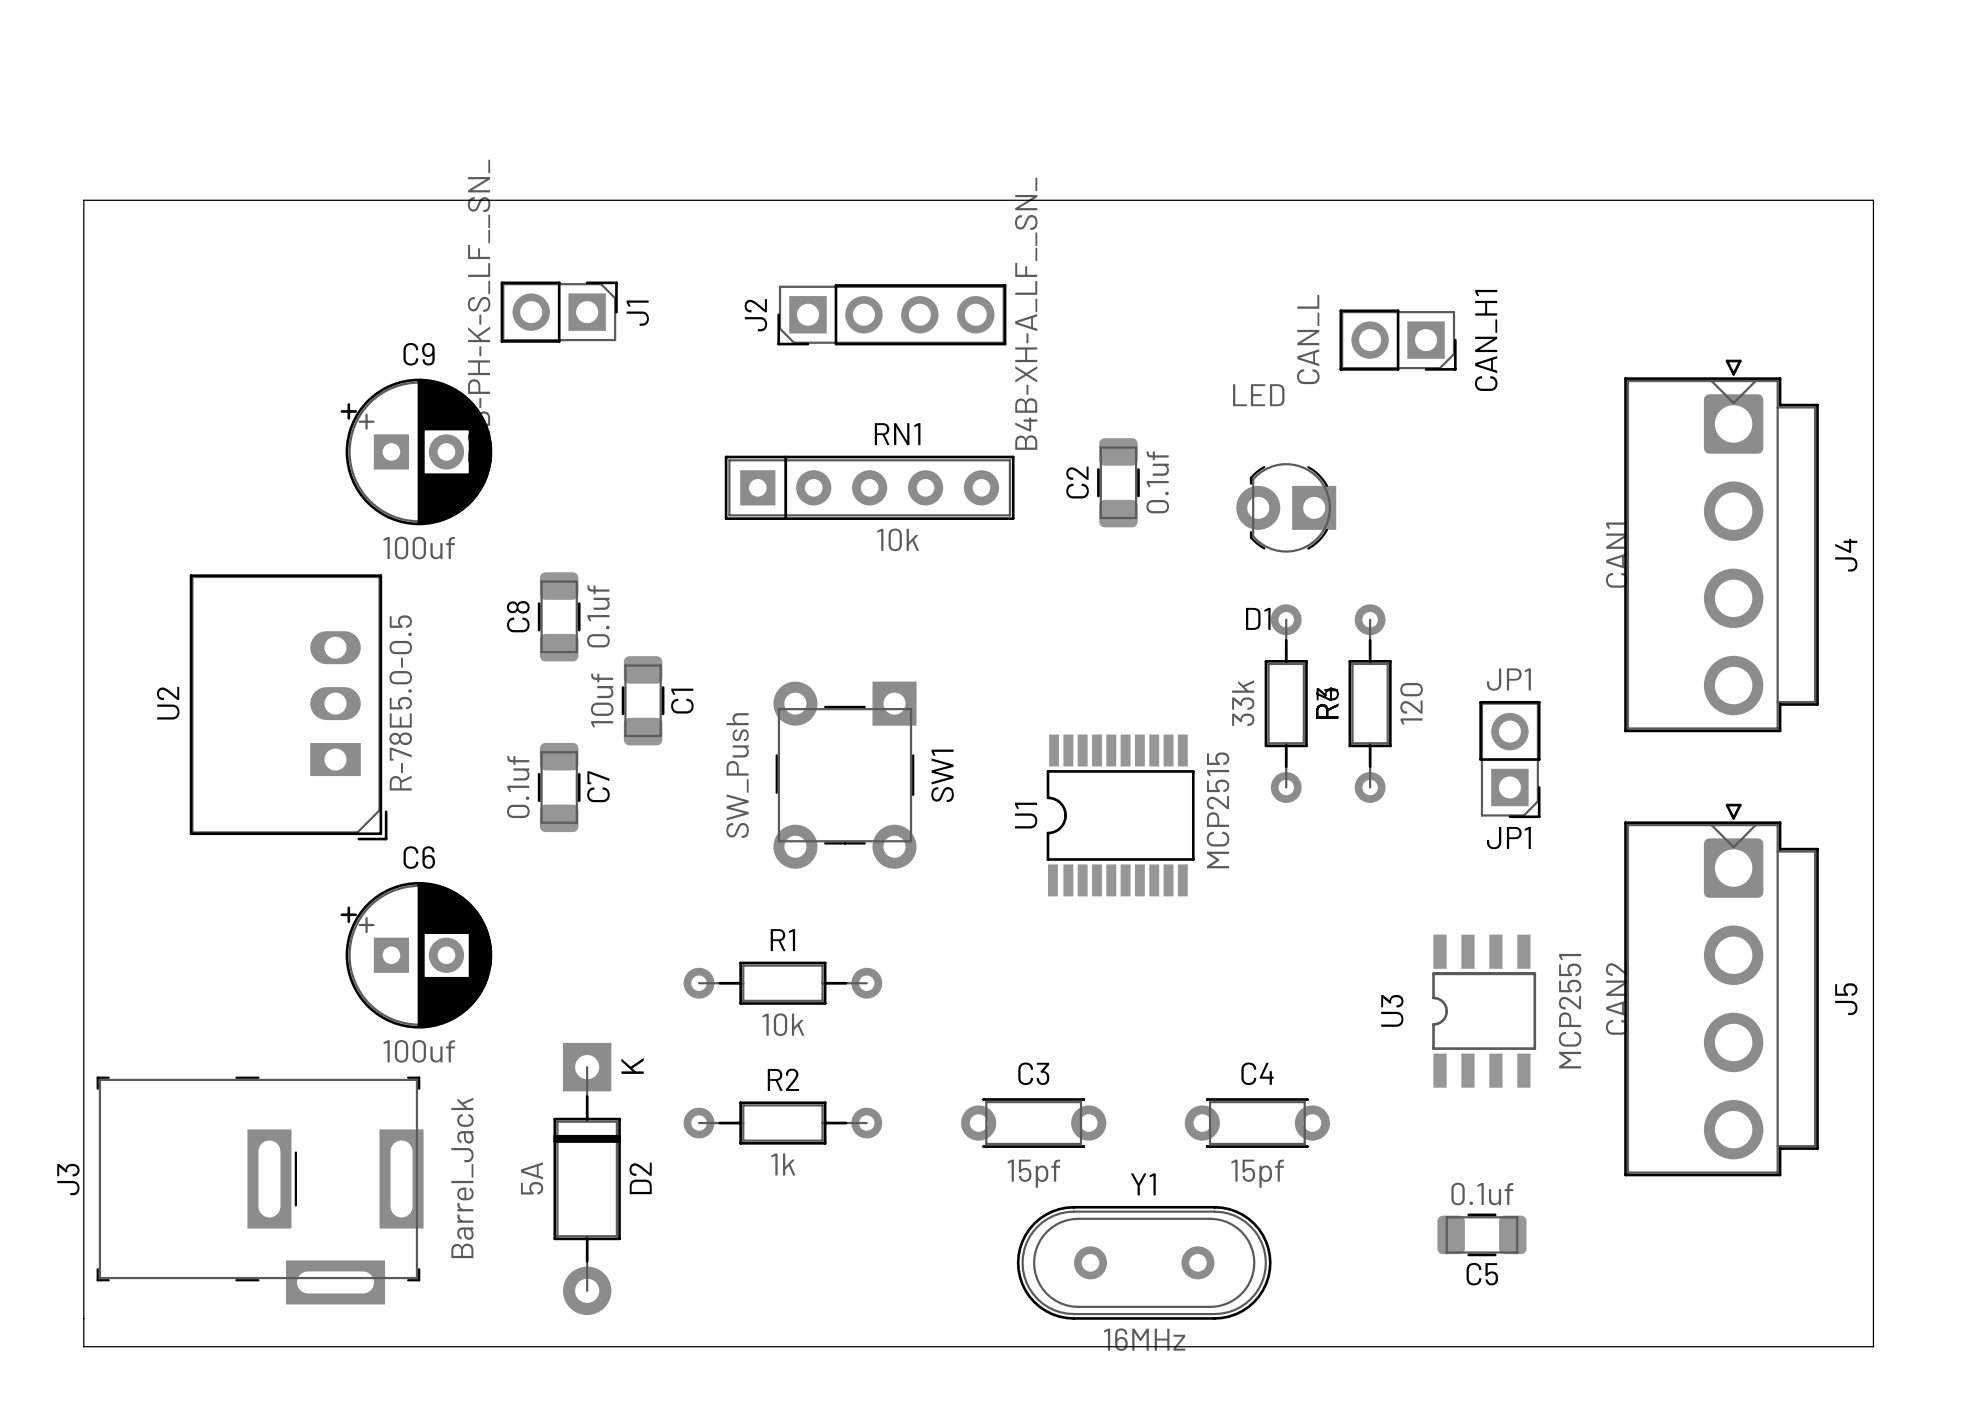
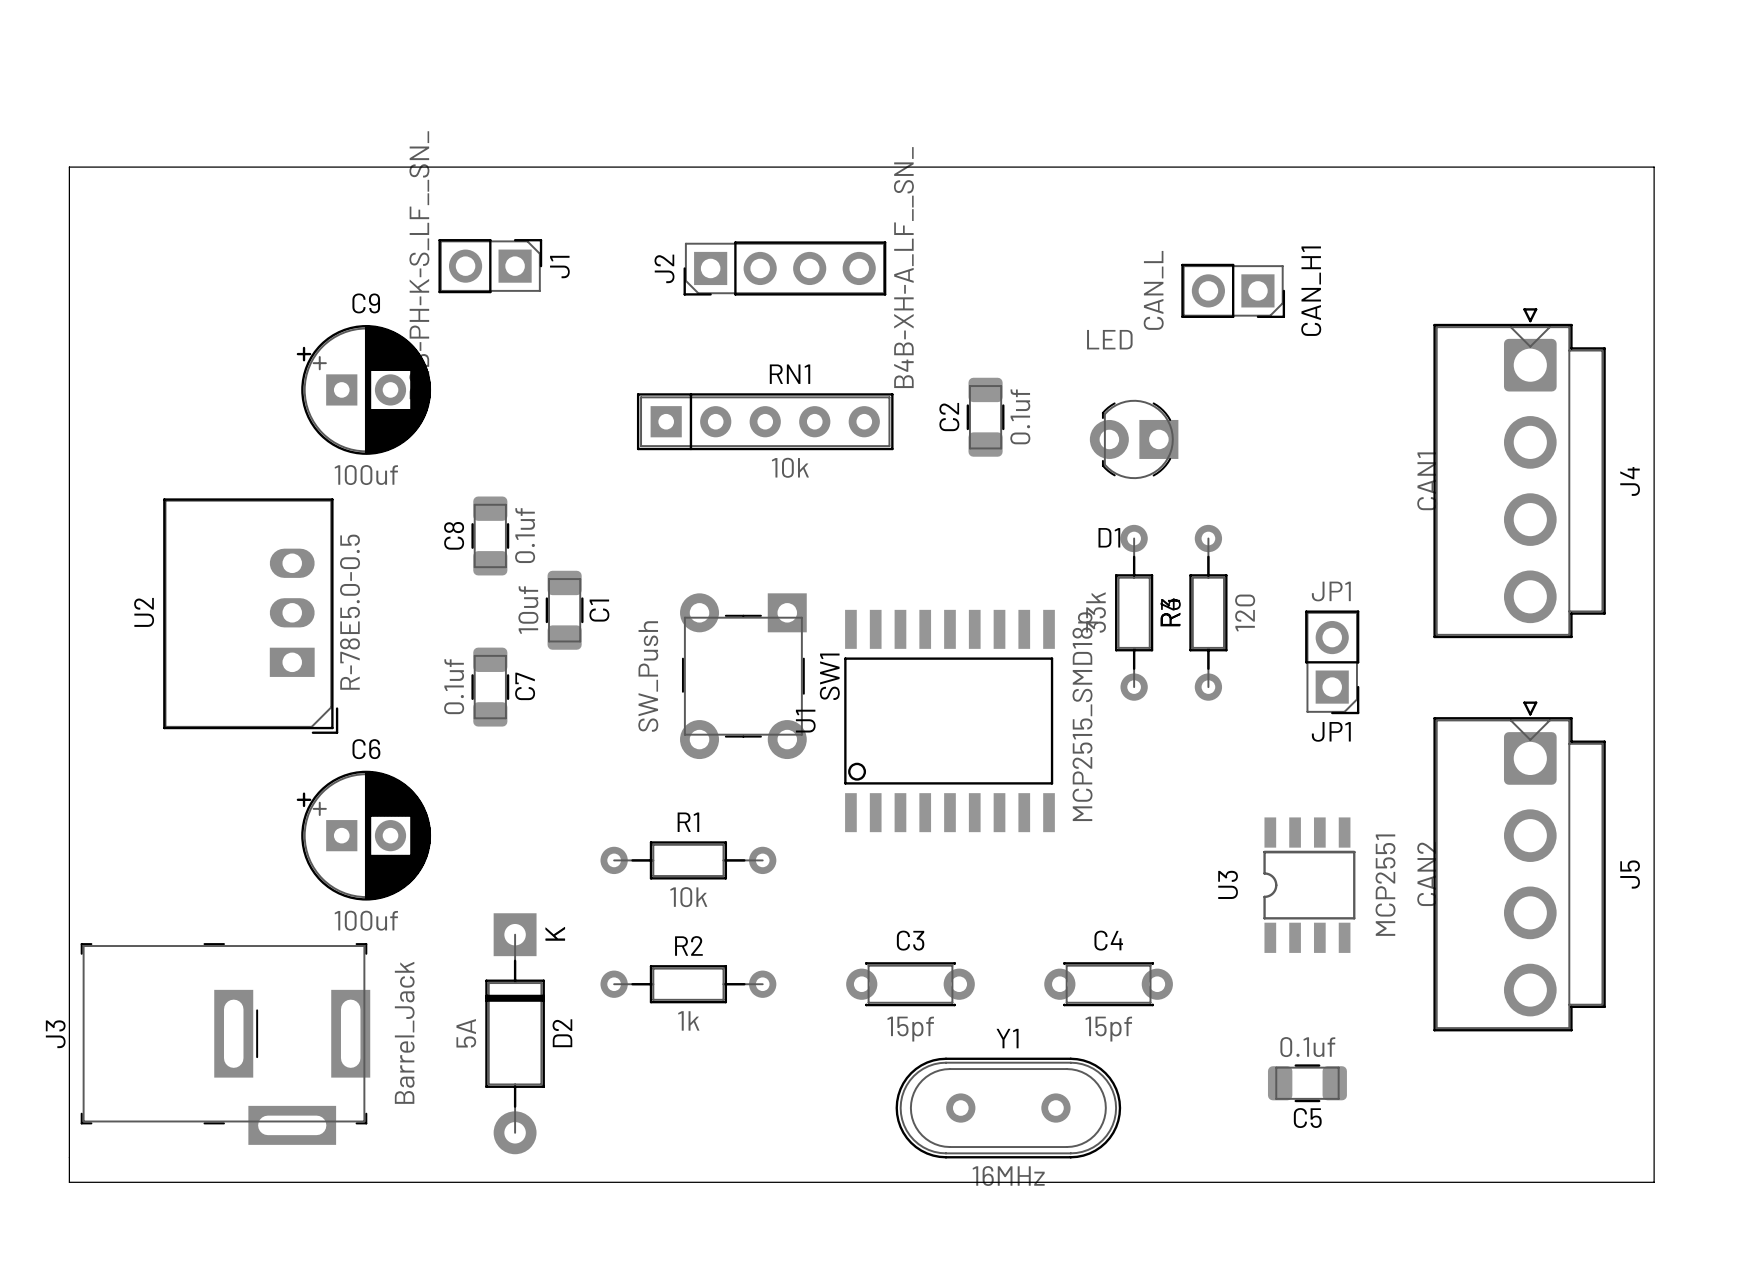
U1 footprint: [1046, 734, 1195, 897] -> [844, 609, 1055, 833]
U1 value: MCP2515 (1218, 810) -> MCP2515_SMD18p (1085, 716)
U1 name position: U1 (1026, 815) -> U1 (805, 721)

